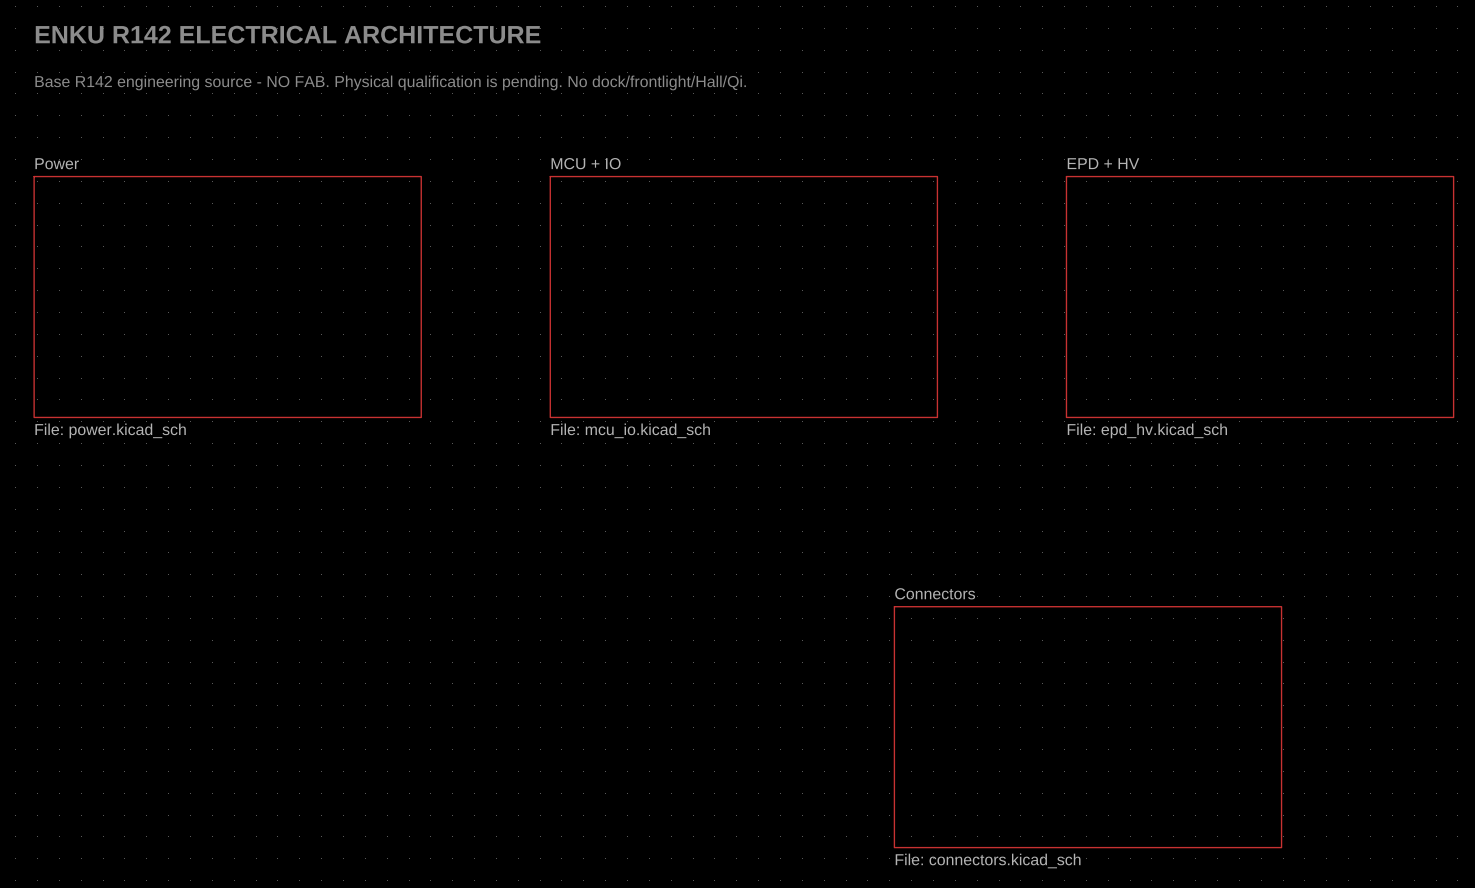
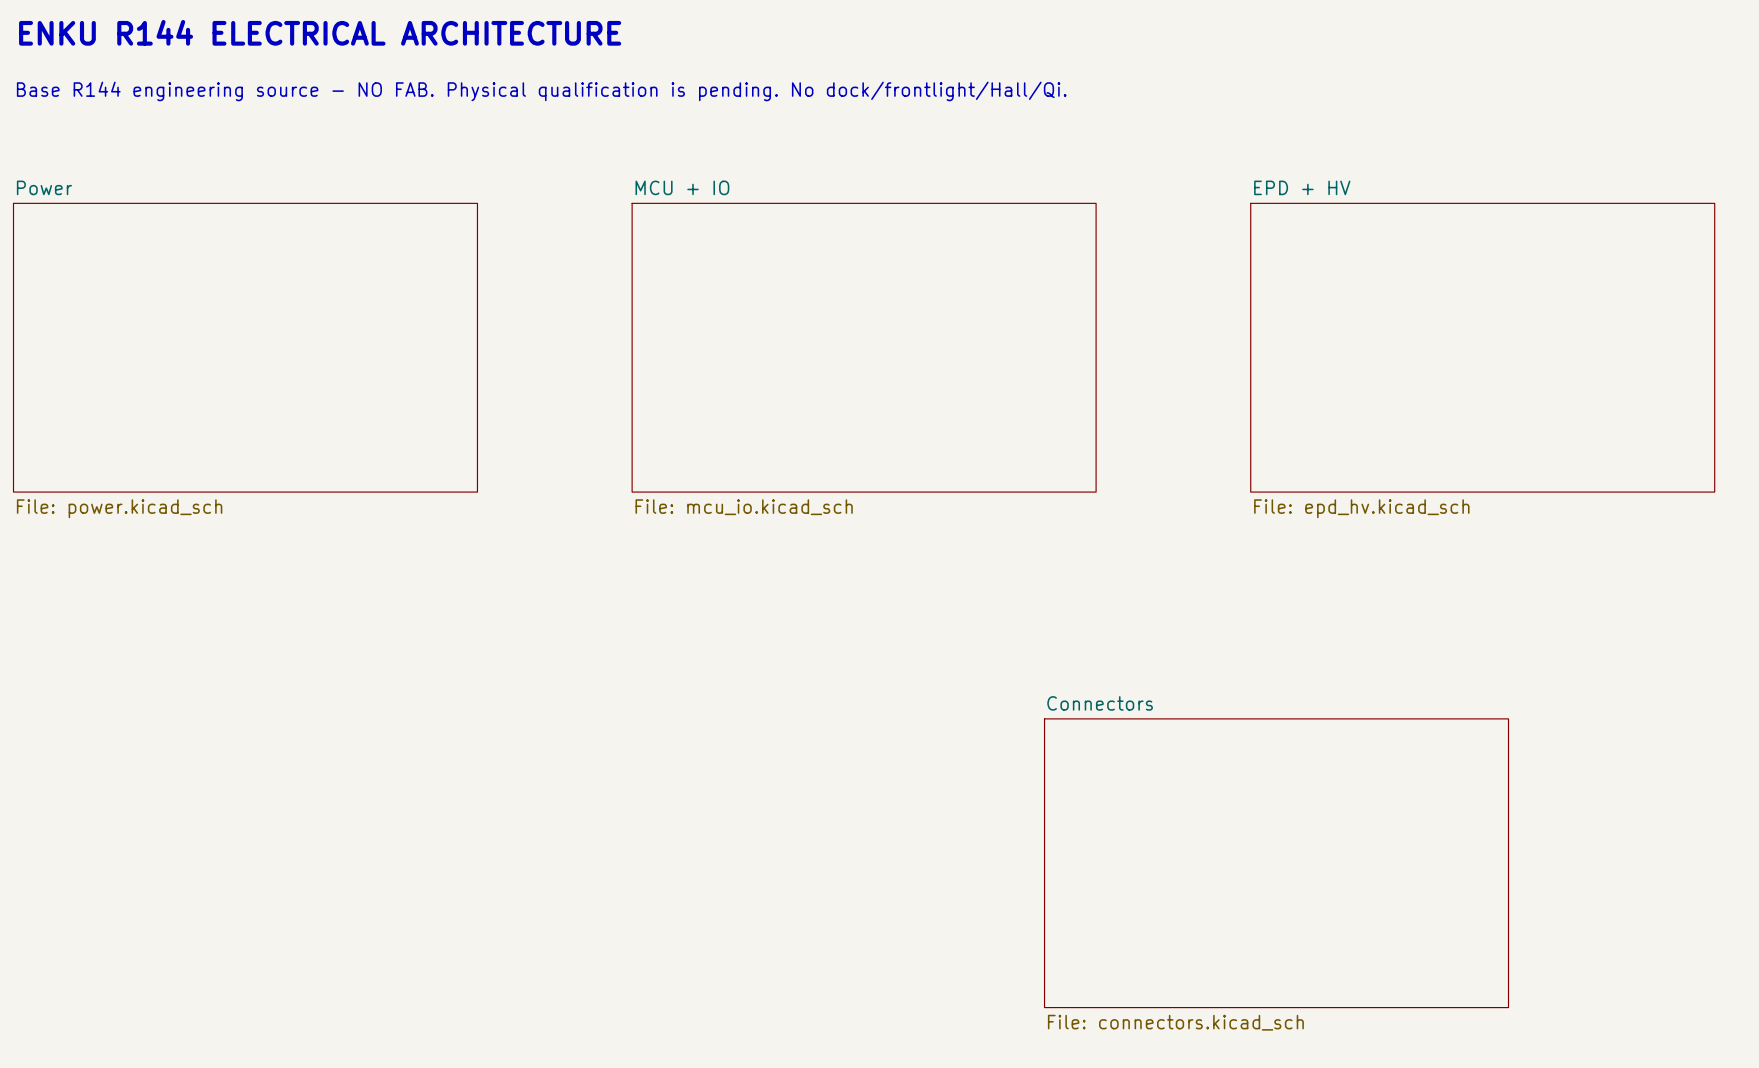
text: ENKU R142 ELECTRICAL ARCHITECTURE (288, 34) -> ENKU R144 ELECTRICAL ARCHITECTURE (320, 32)
text: Base R142 engineering source - NO FAB. Physical qualification is pending. No dock/frontlight/Hall/Qi. (390, 82) -> Base R144 engineering source - NO FAB. Physical qualification is pending. No dock/frontlight/Hall/Qi. (541, 91)

